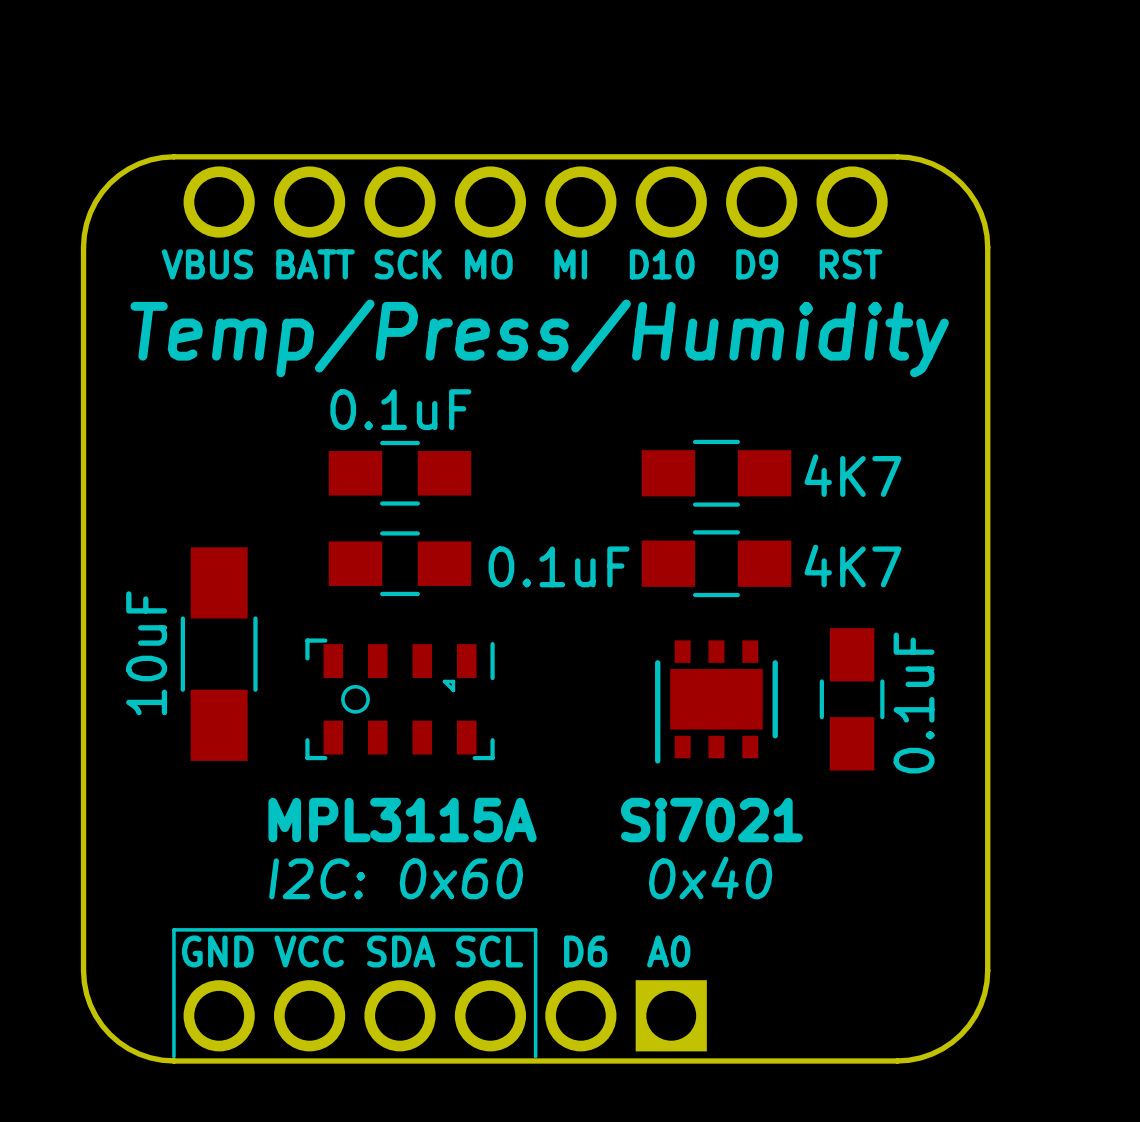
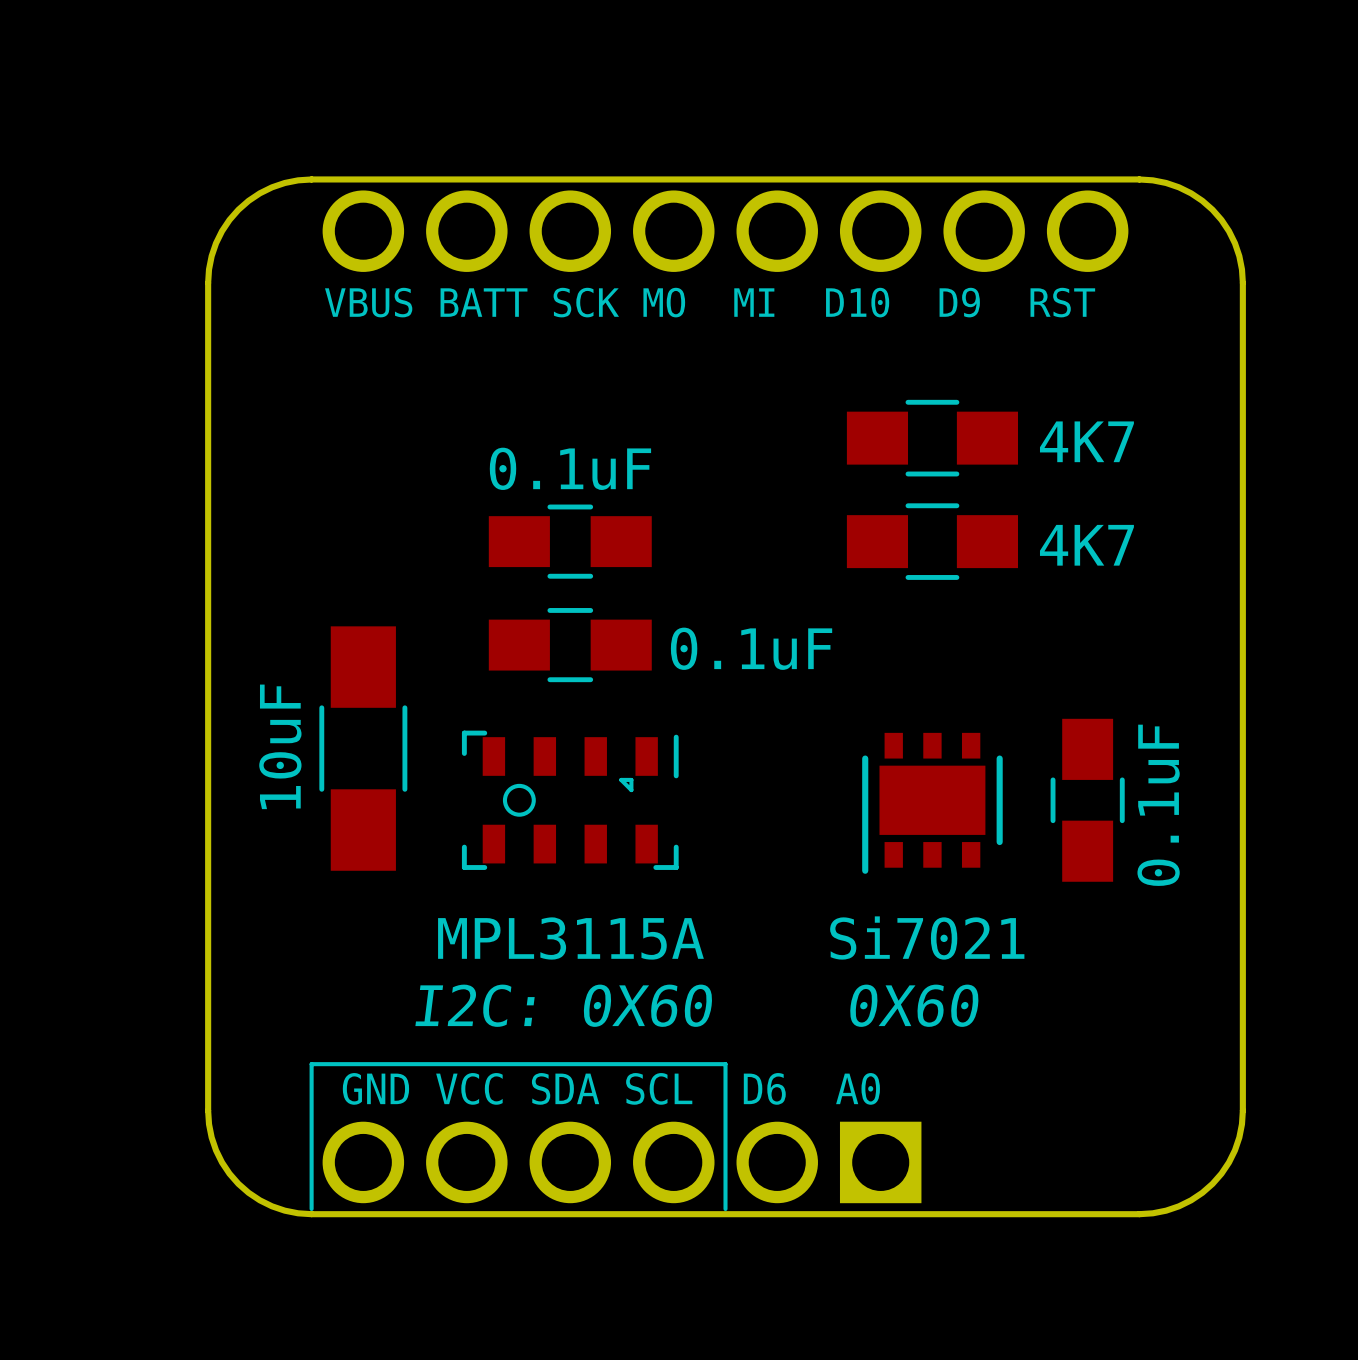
text: Temp/Press/Humidity (539, 338) -> none
part position: (716, 563) -> (932, 438)
text: 0x40 (710, 877) -> 0X60 (914, 1005)
text: I2C: 0x60 (396, 878) -> I2C: 0X60 (564, 1005)

